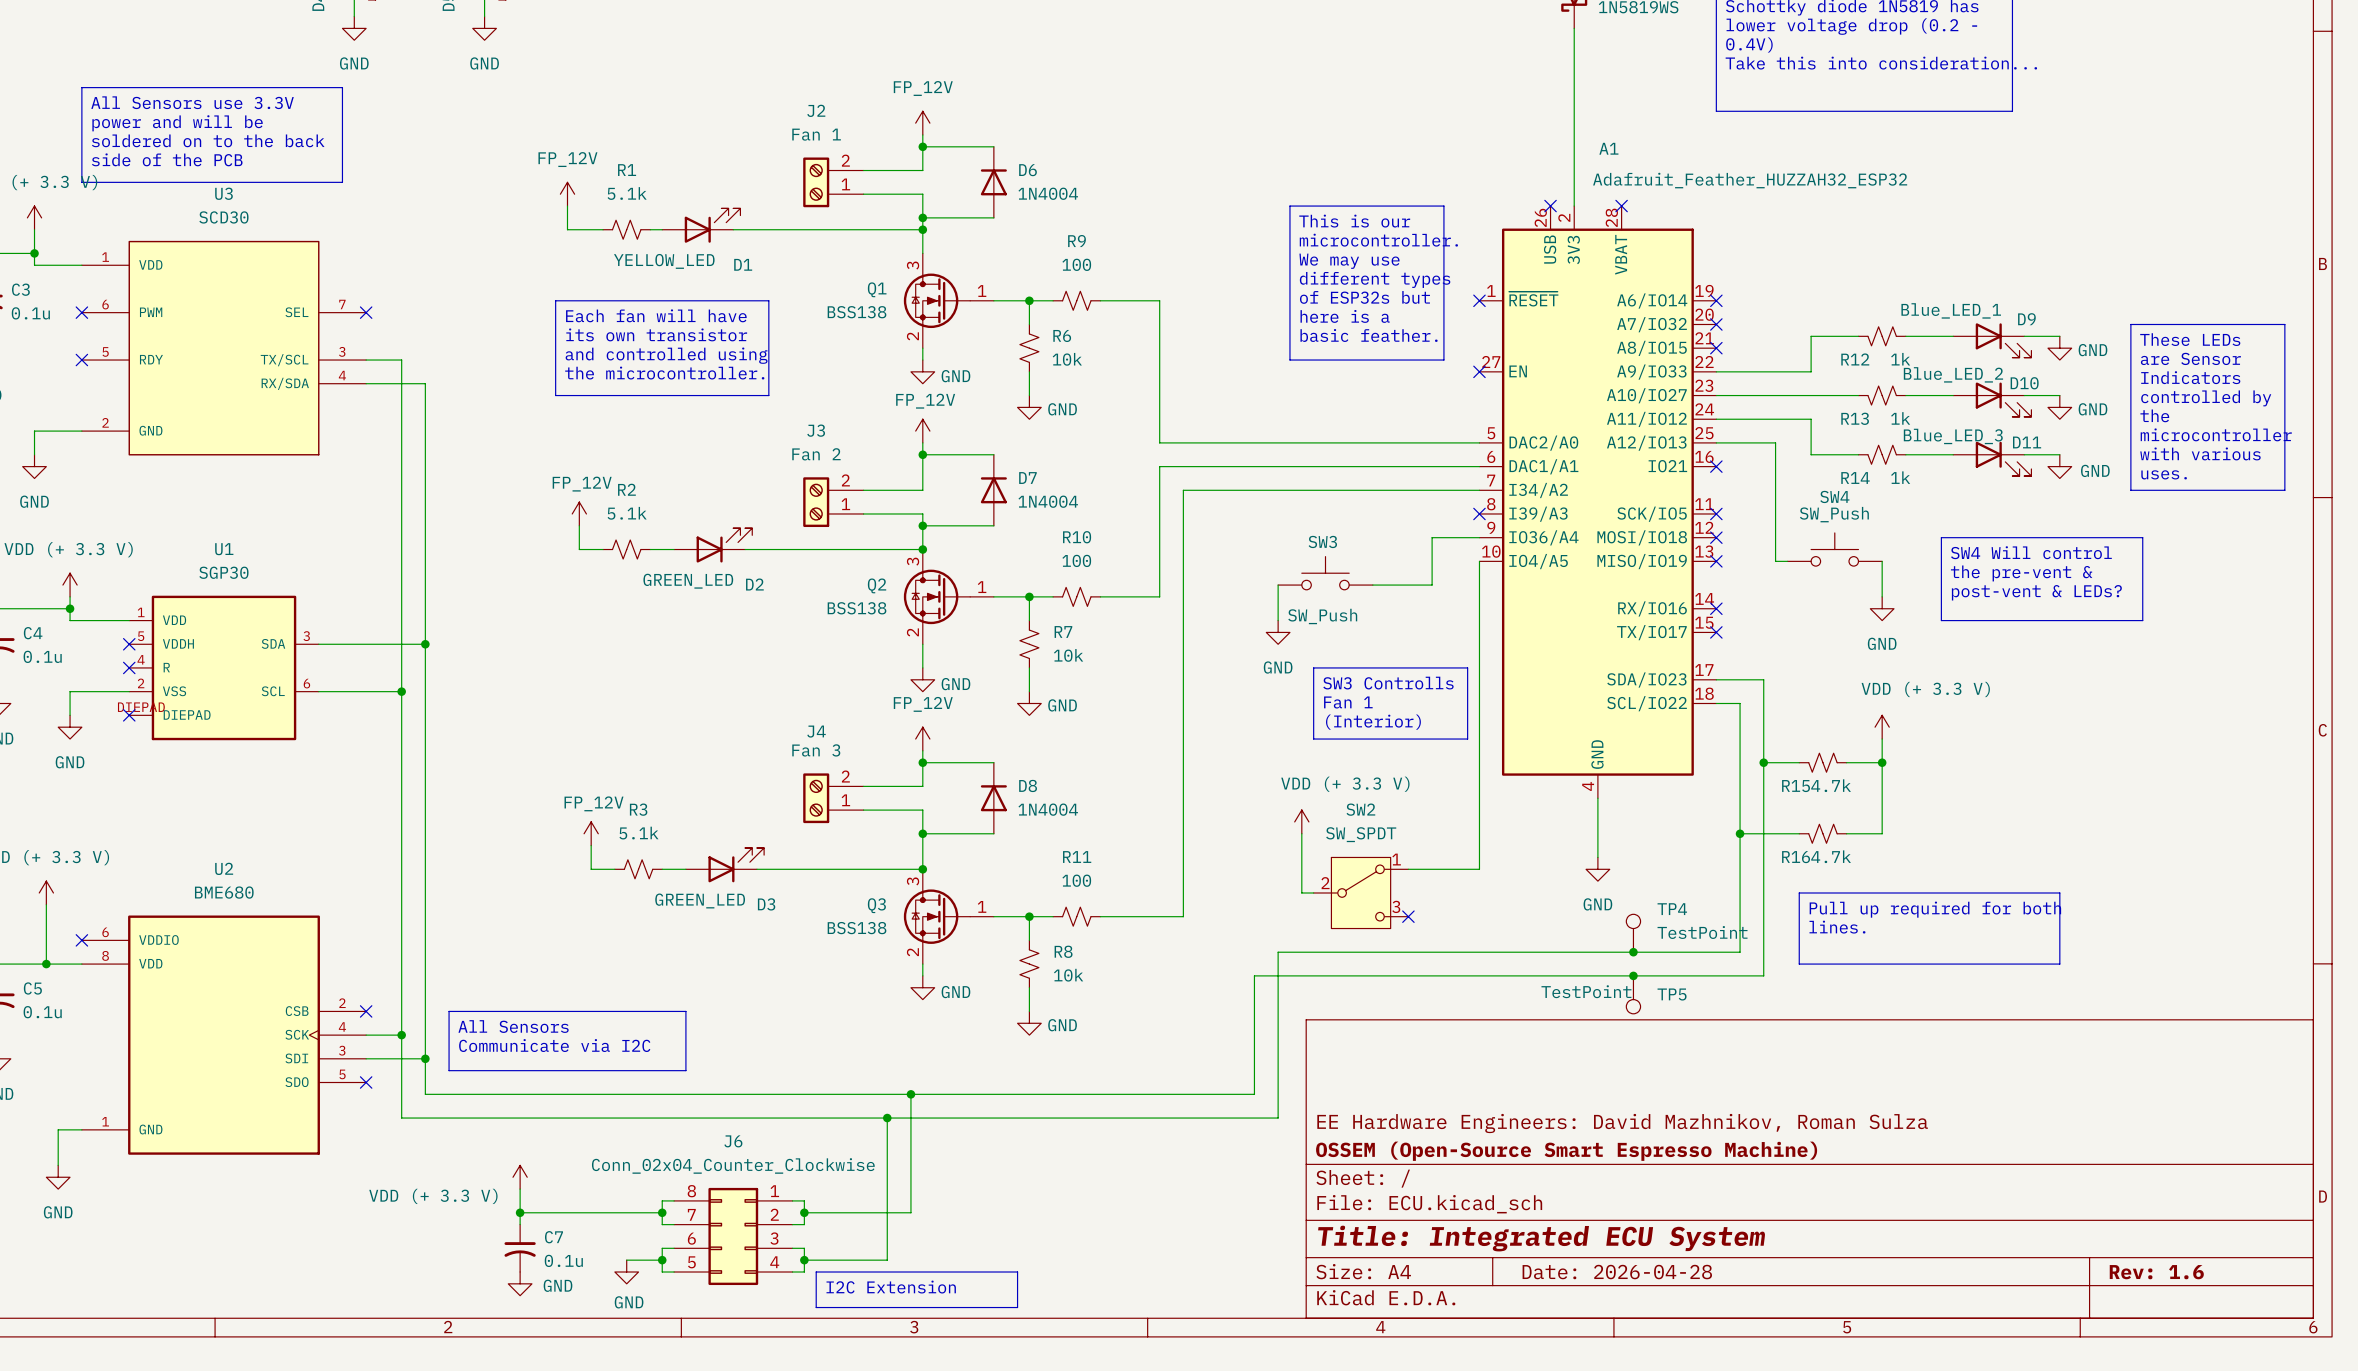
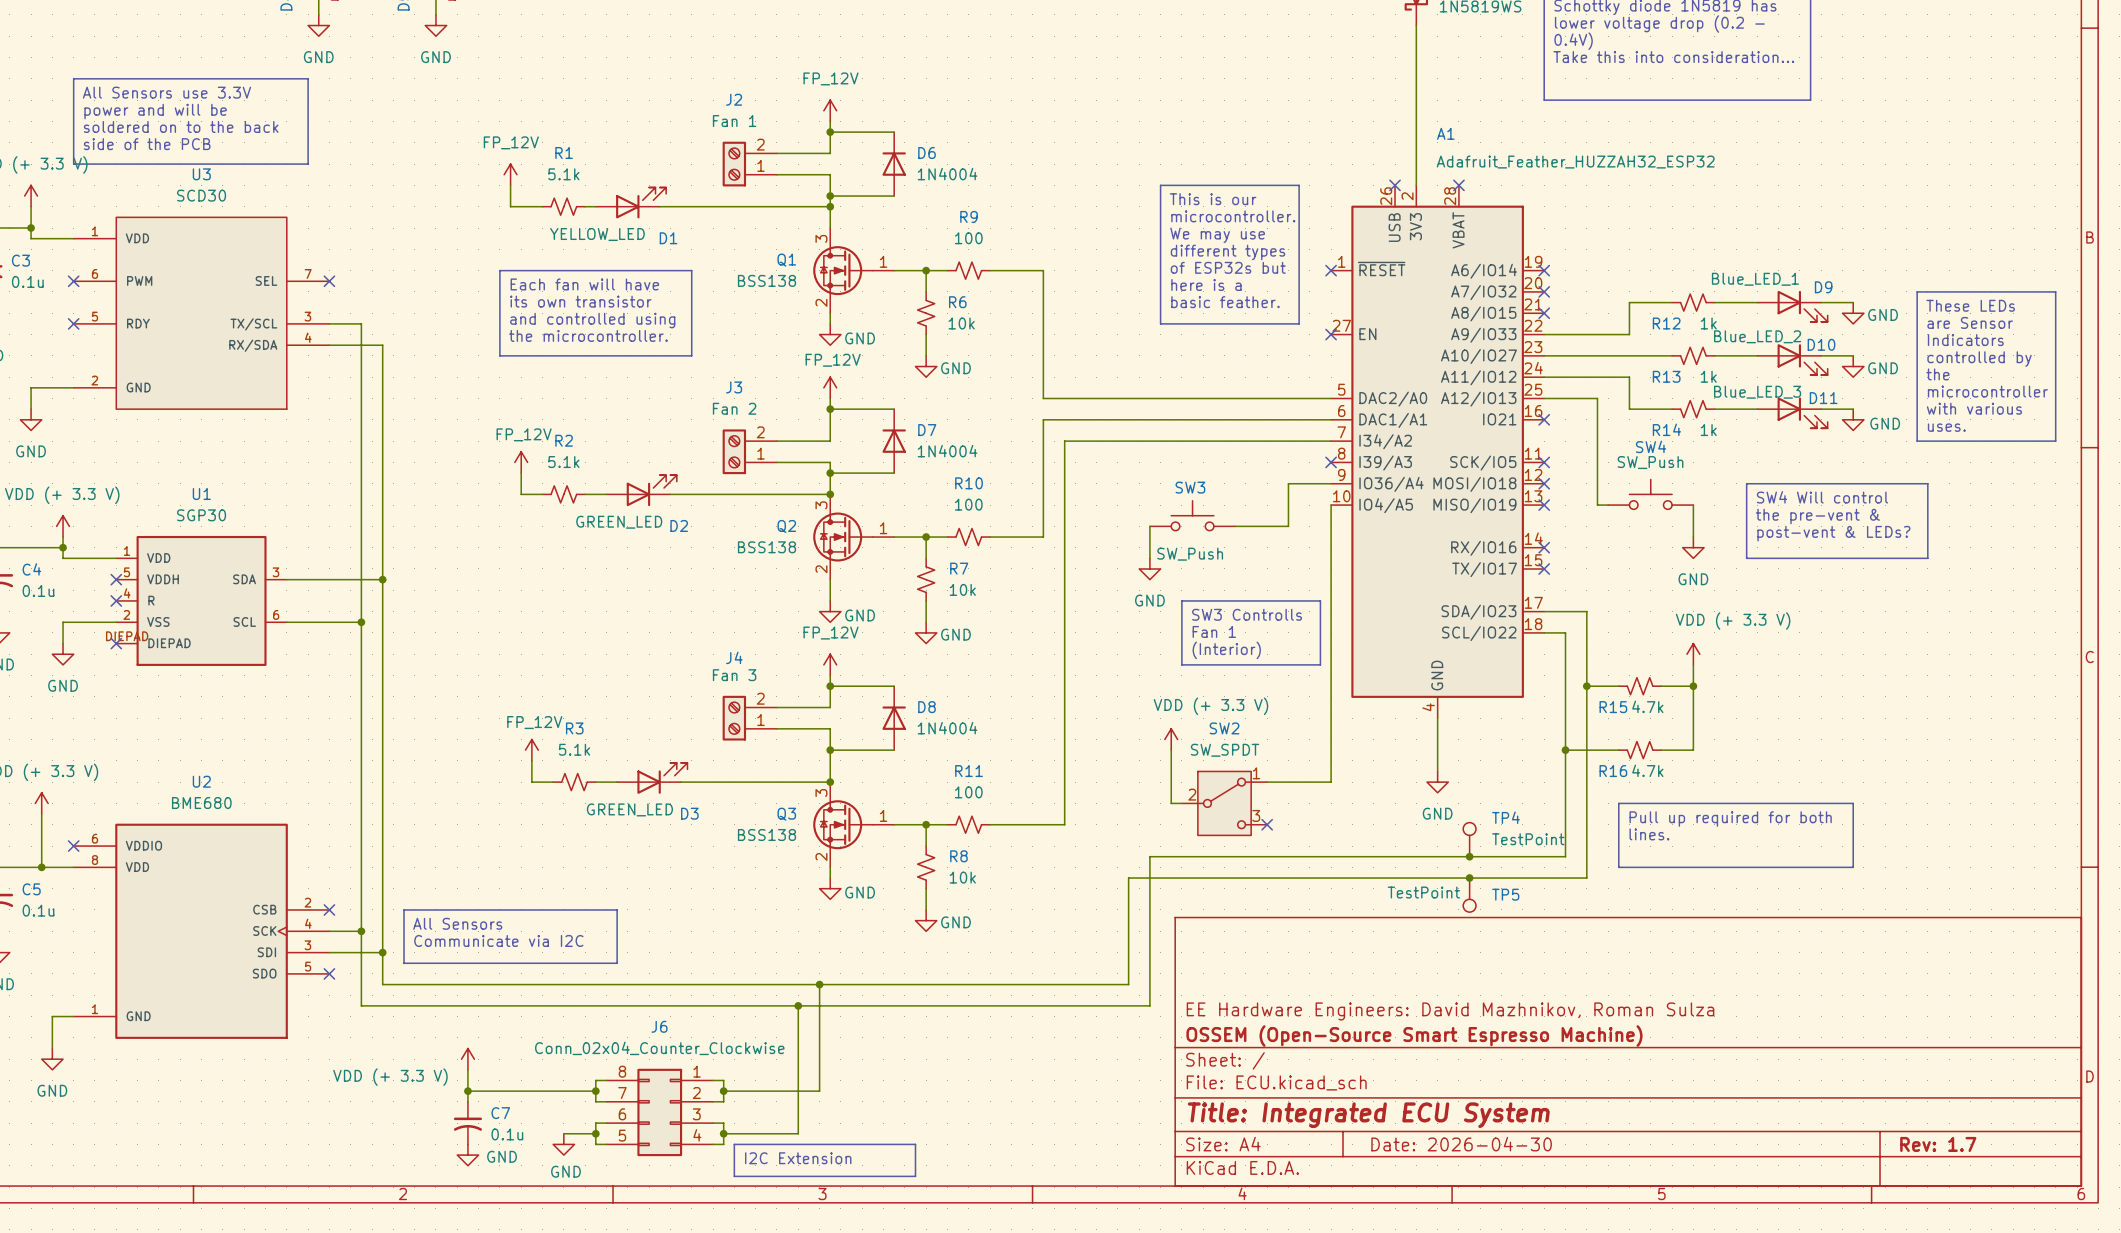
title block: Date: 2026-04-28 (1617, 1272) -> Date: 2026-04-30 (1461, 1144)
title block: Rev: 1.6 (2156, 1272) -> Rev: 1.7 (1938, 1144)

